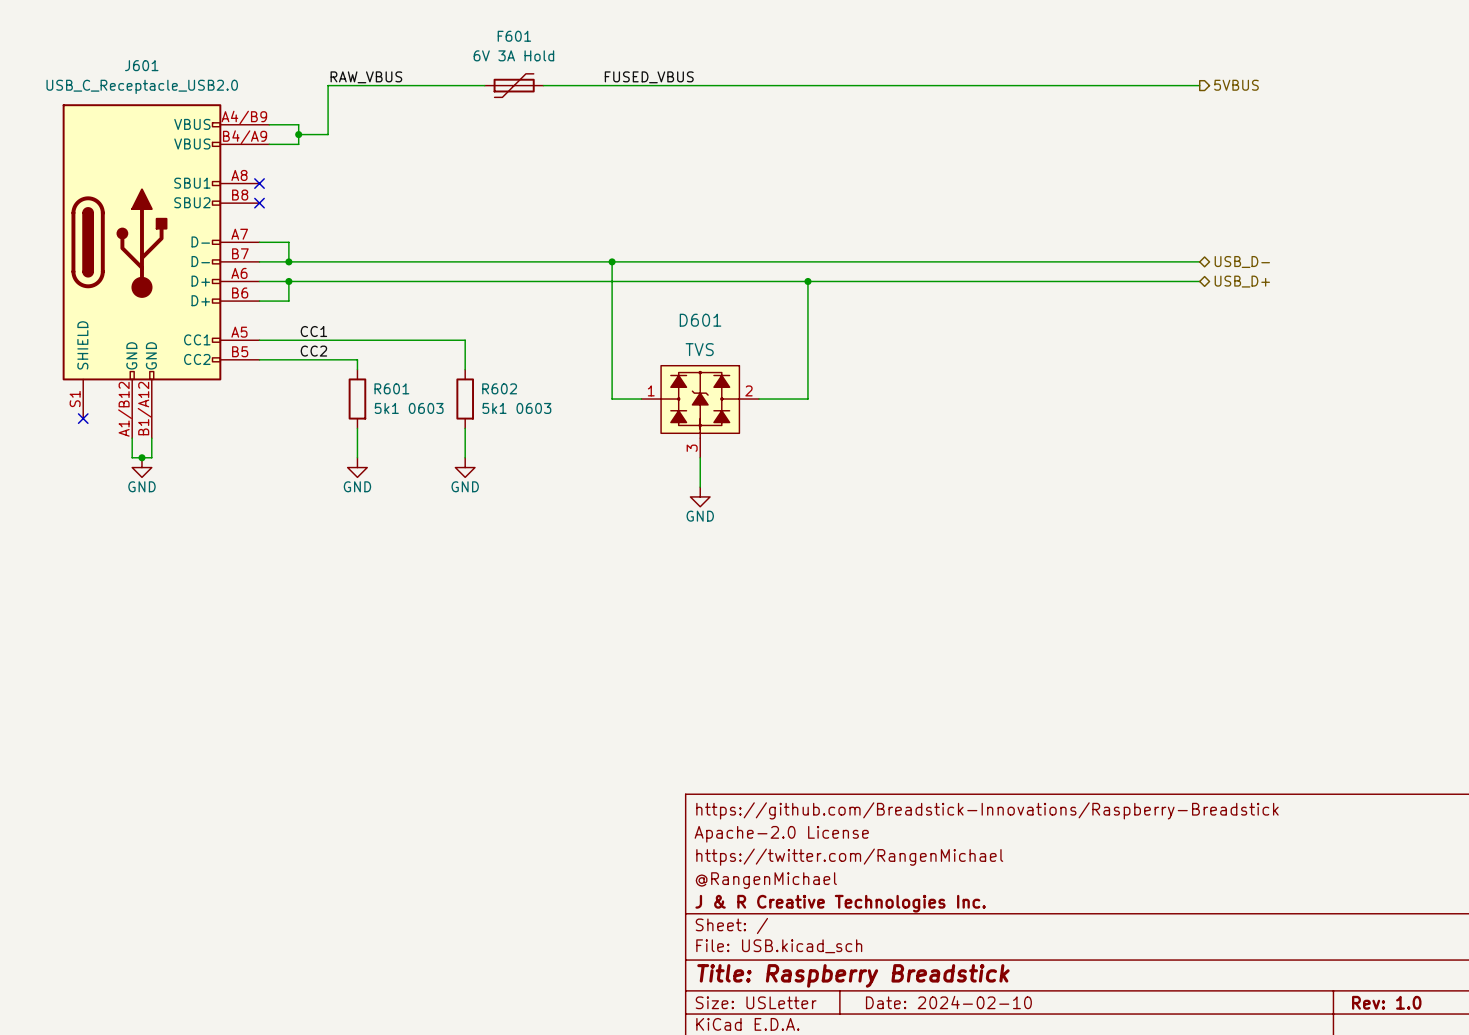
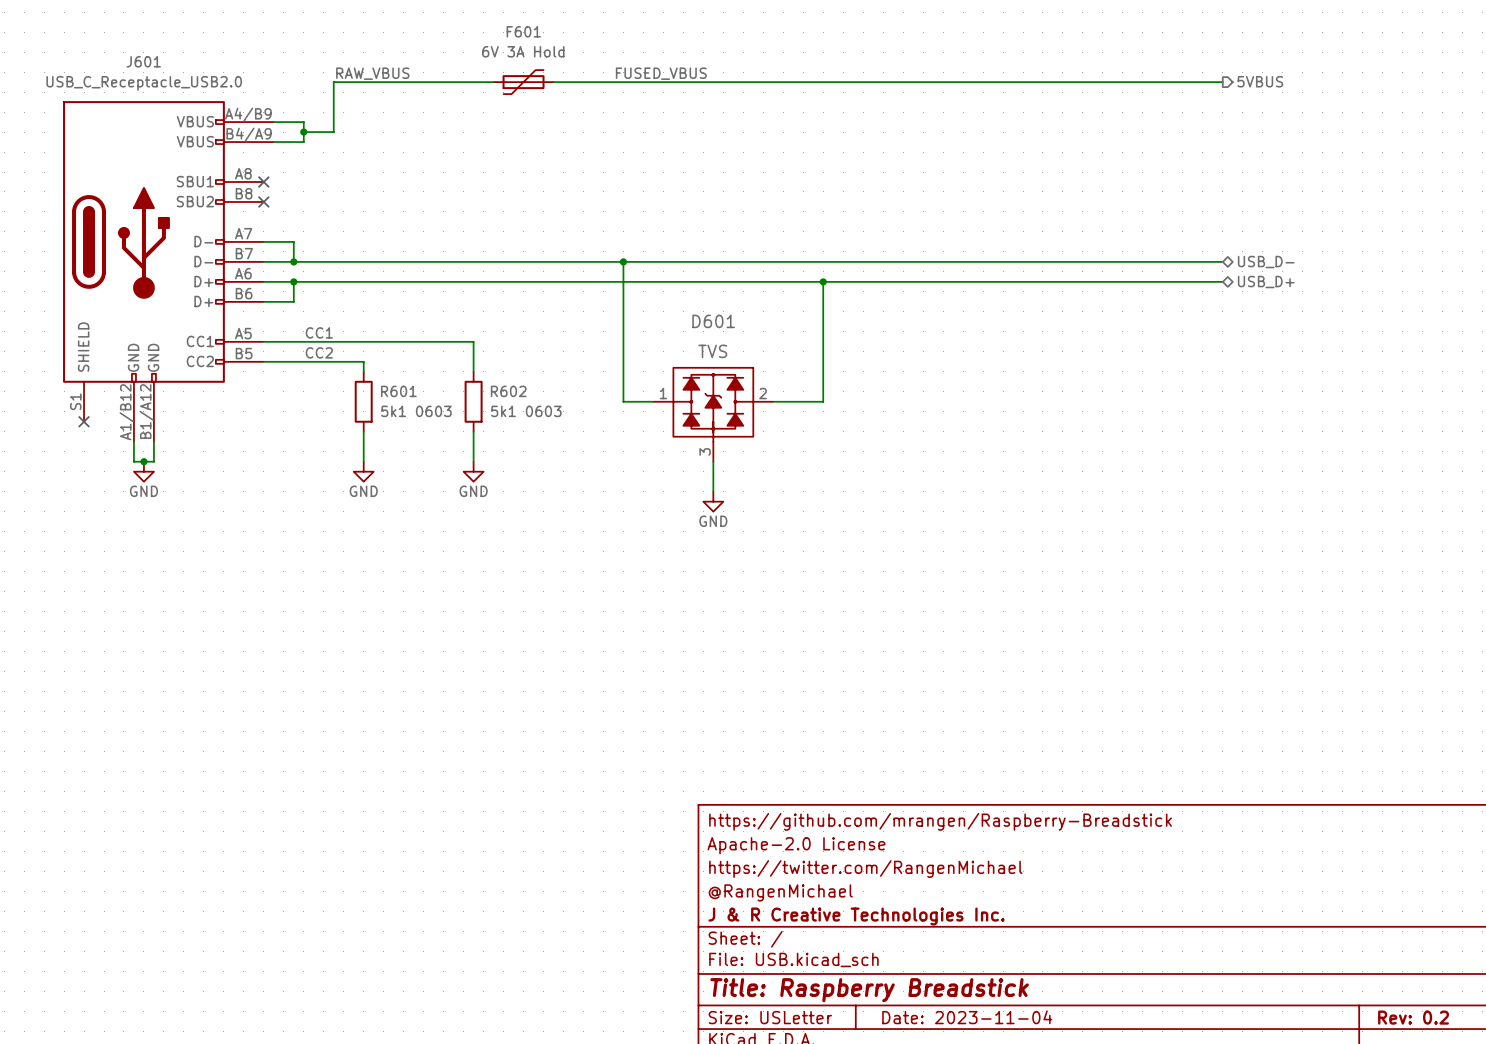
title block: https://github.com/Breadstick-Innovations/Raspberry-Breadstick (987, 810) -> https://github.com/mrangen/Raspberry-Breadstick (940, 821)
title block: Date: 2024-02-10 (948, 1002) -> Date: 2023-11-04 (967, 1017)
title block: Rev: 1.0 (1386, 1002) -> Rev: 0.2 (1413, 1017)

